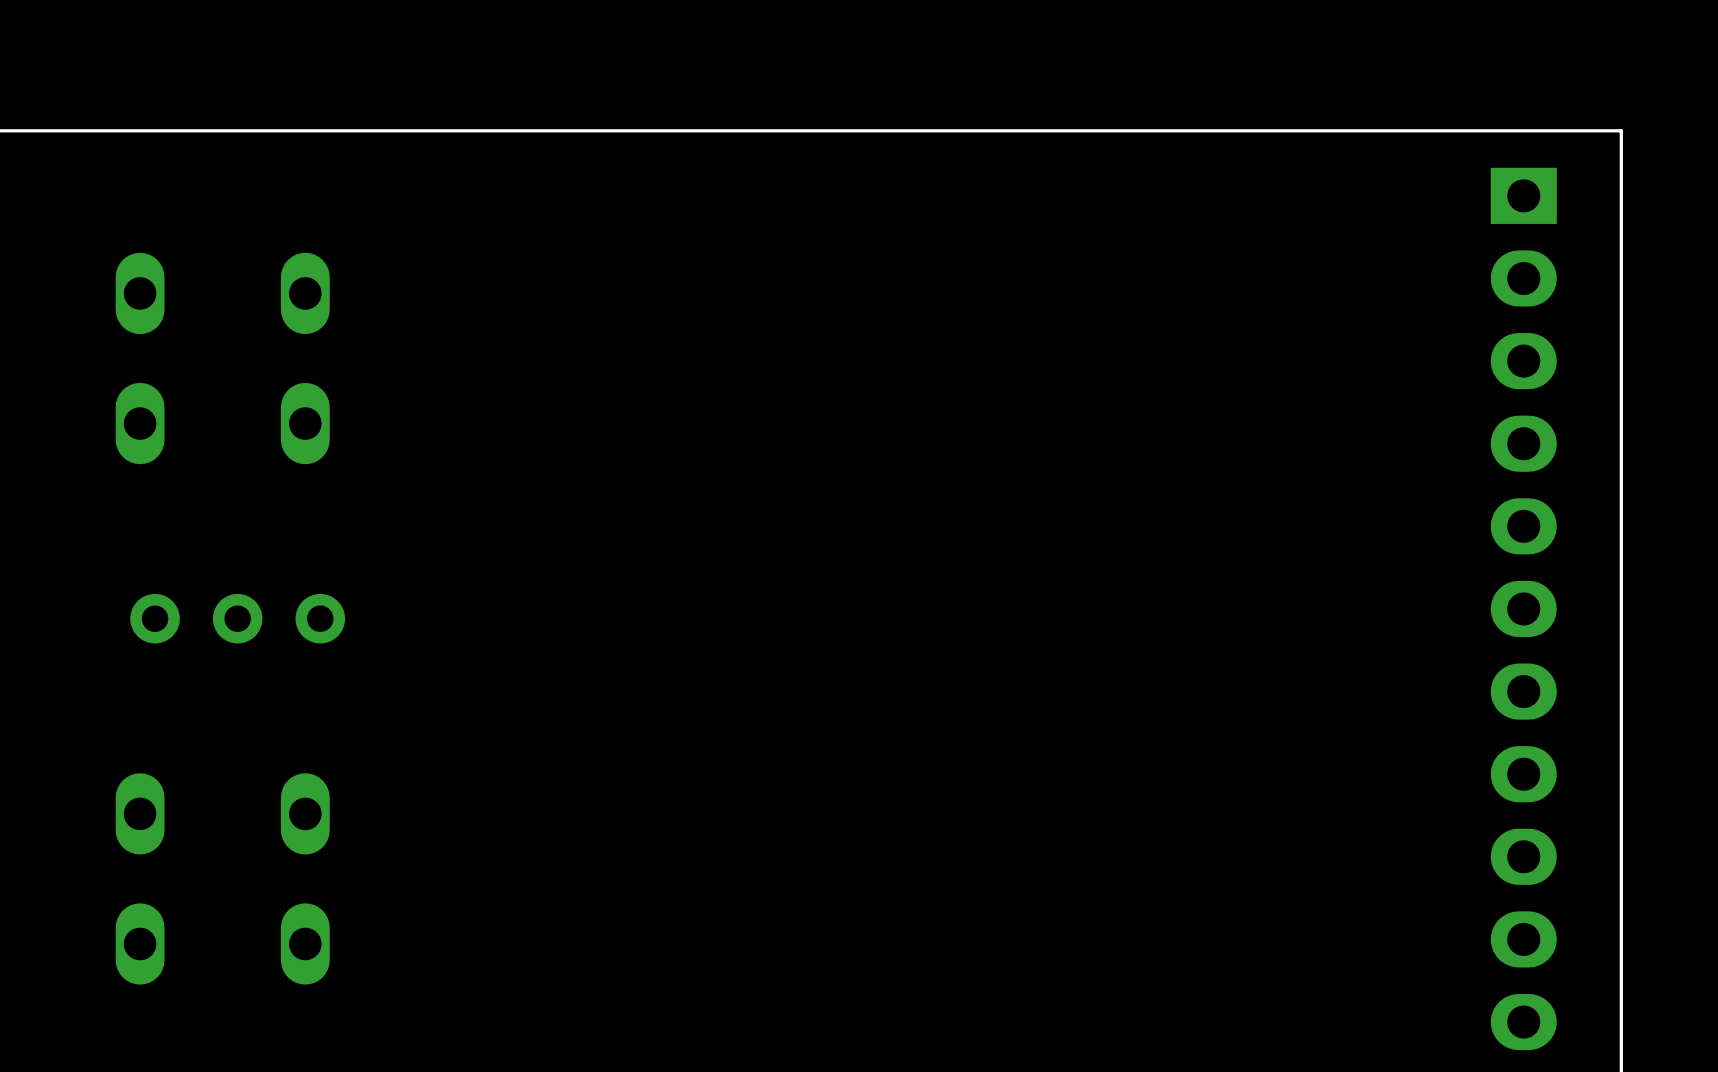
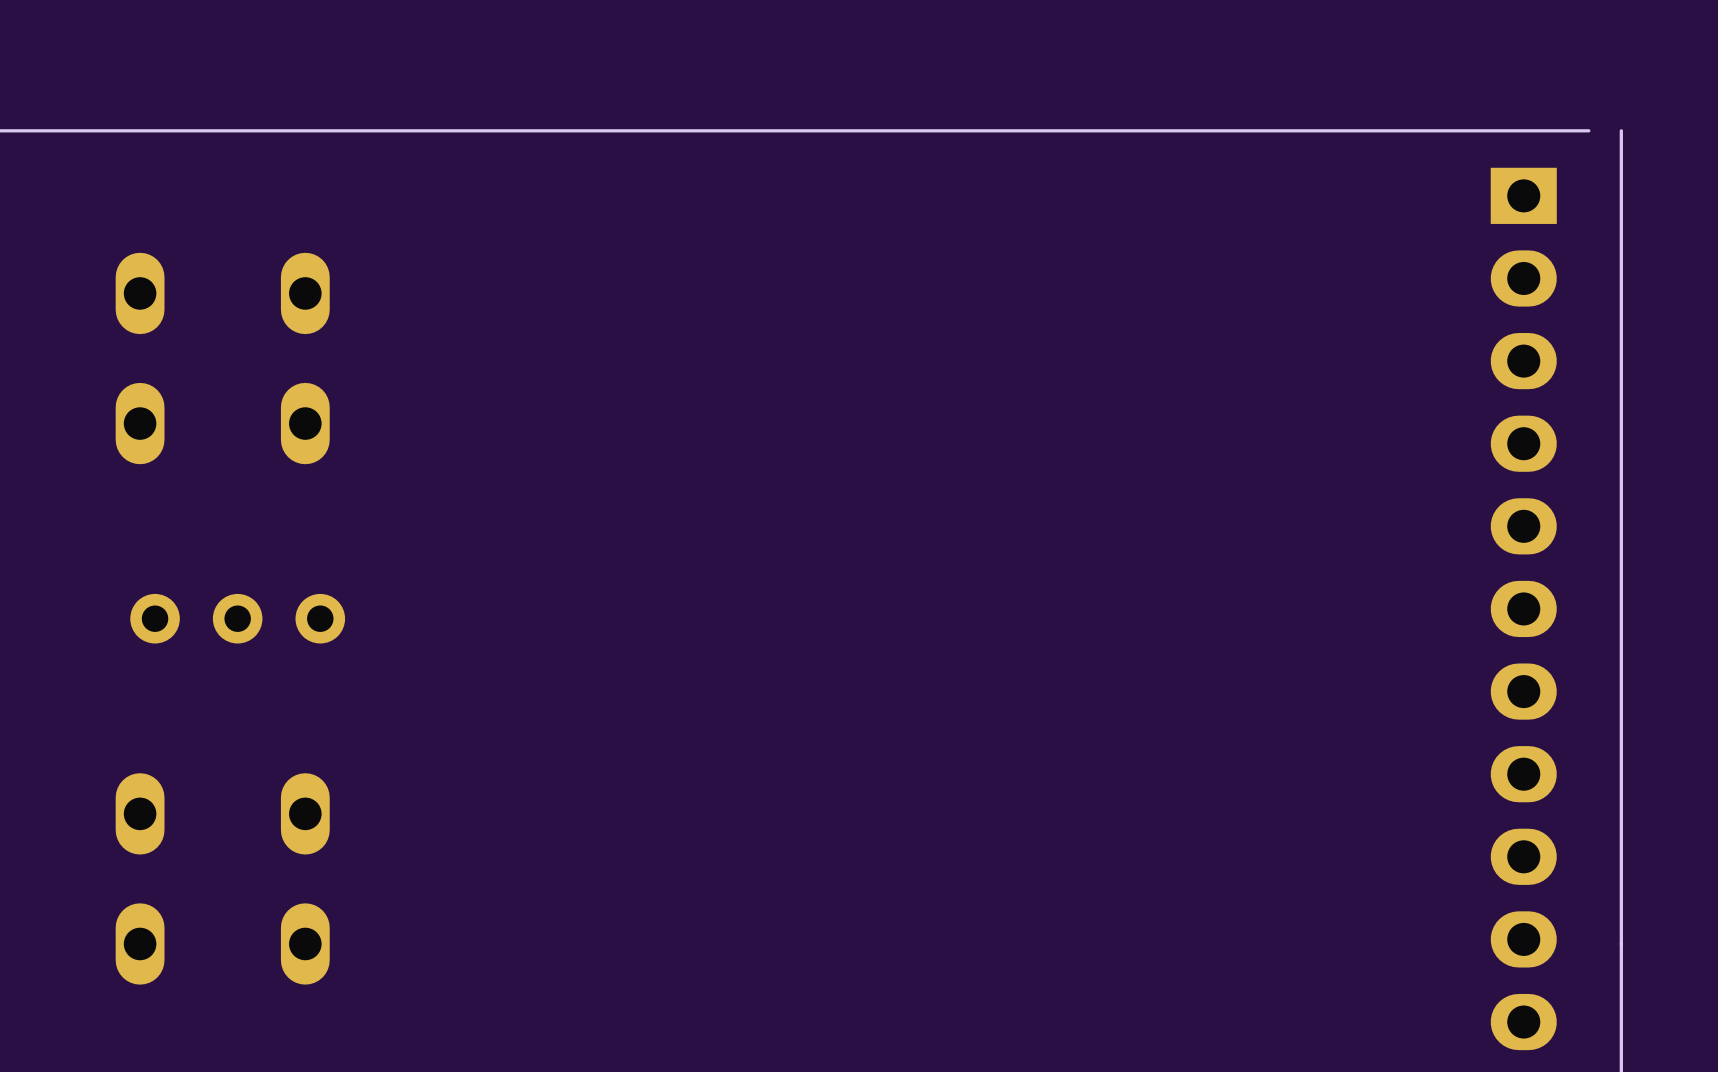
board edge: (1621, 130) (1588, 130) -> none

